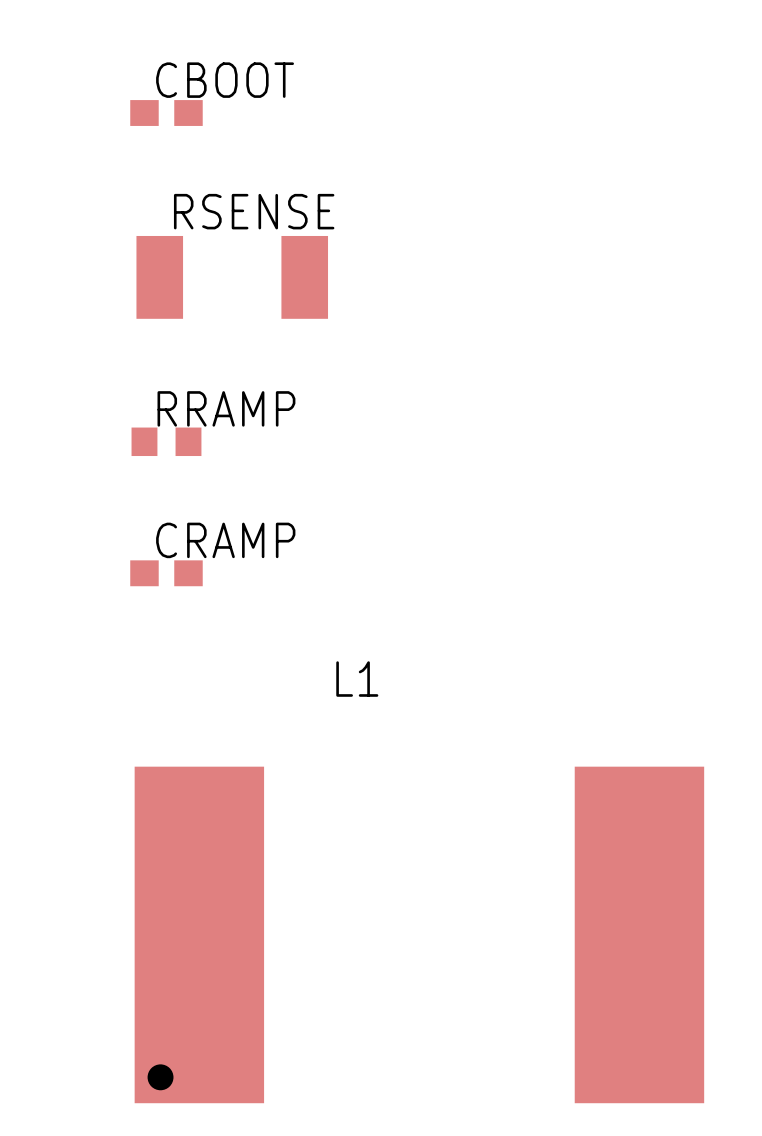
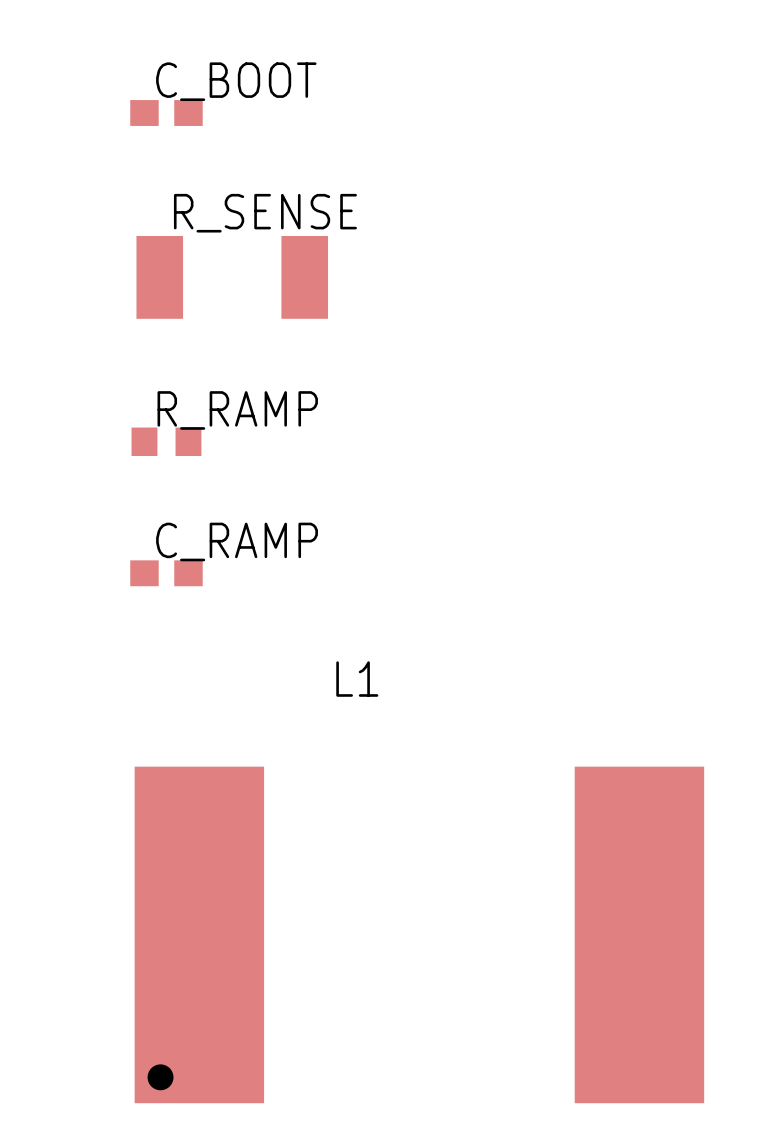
CBOOT name: CBOOT (225, 80) -> C_BOOT (236, 81)
RSENSE name: RSENSE (254, 211) -> R_SENSE (265, 213)
RRAMP name: RRAMP (226, 408) -> R_RAMP (237, 410)
CRAMP name: CRAMP (225, 540) -> C_RAMP (237, 541)

